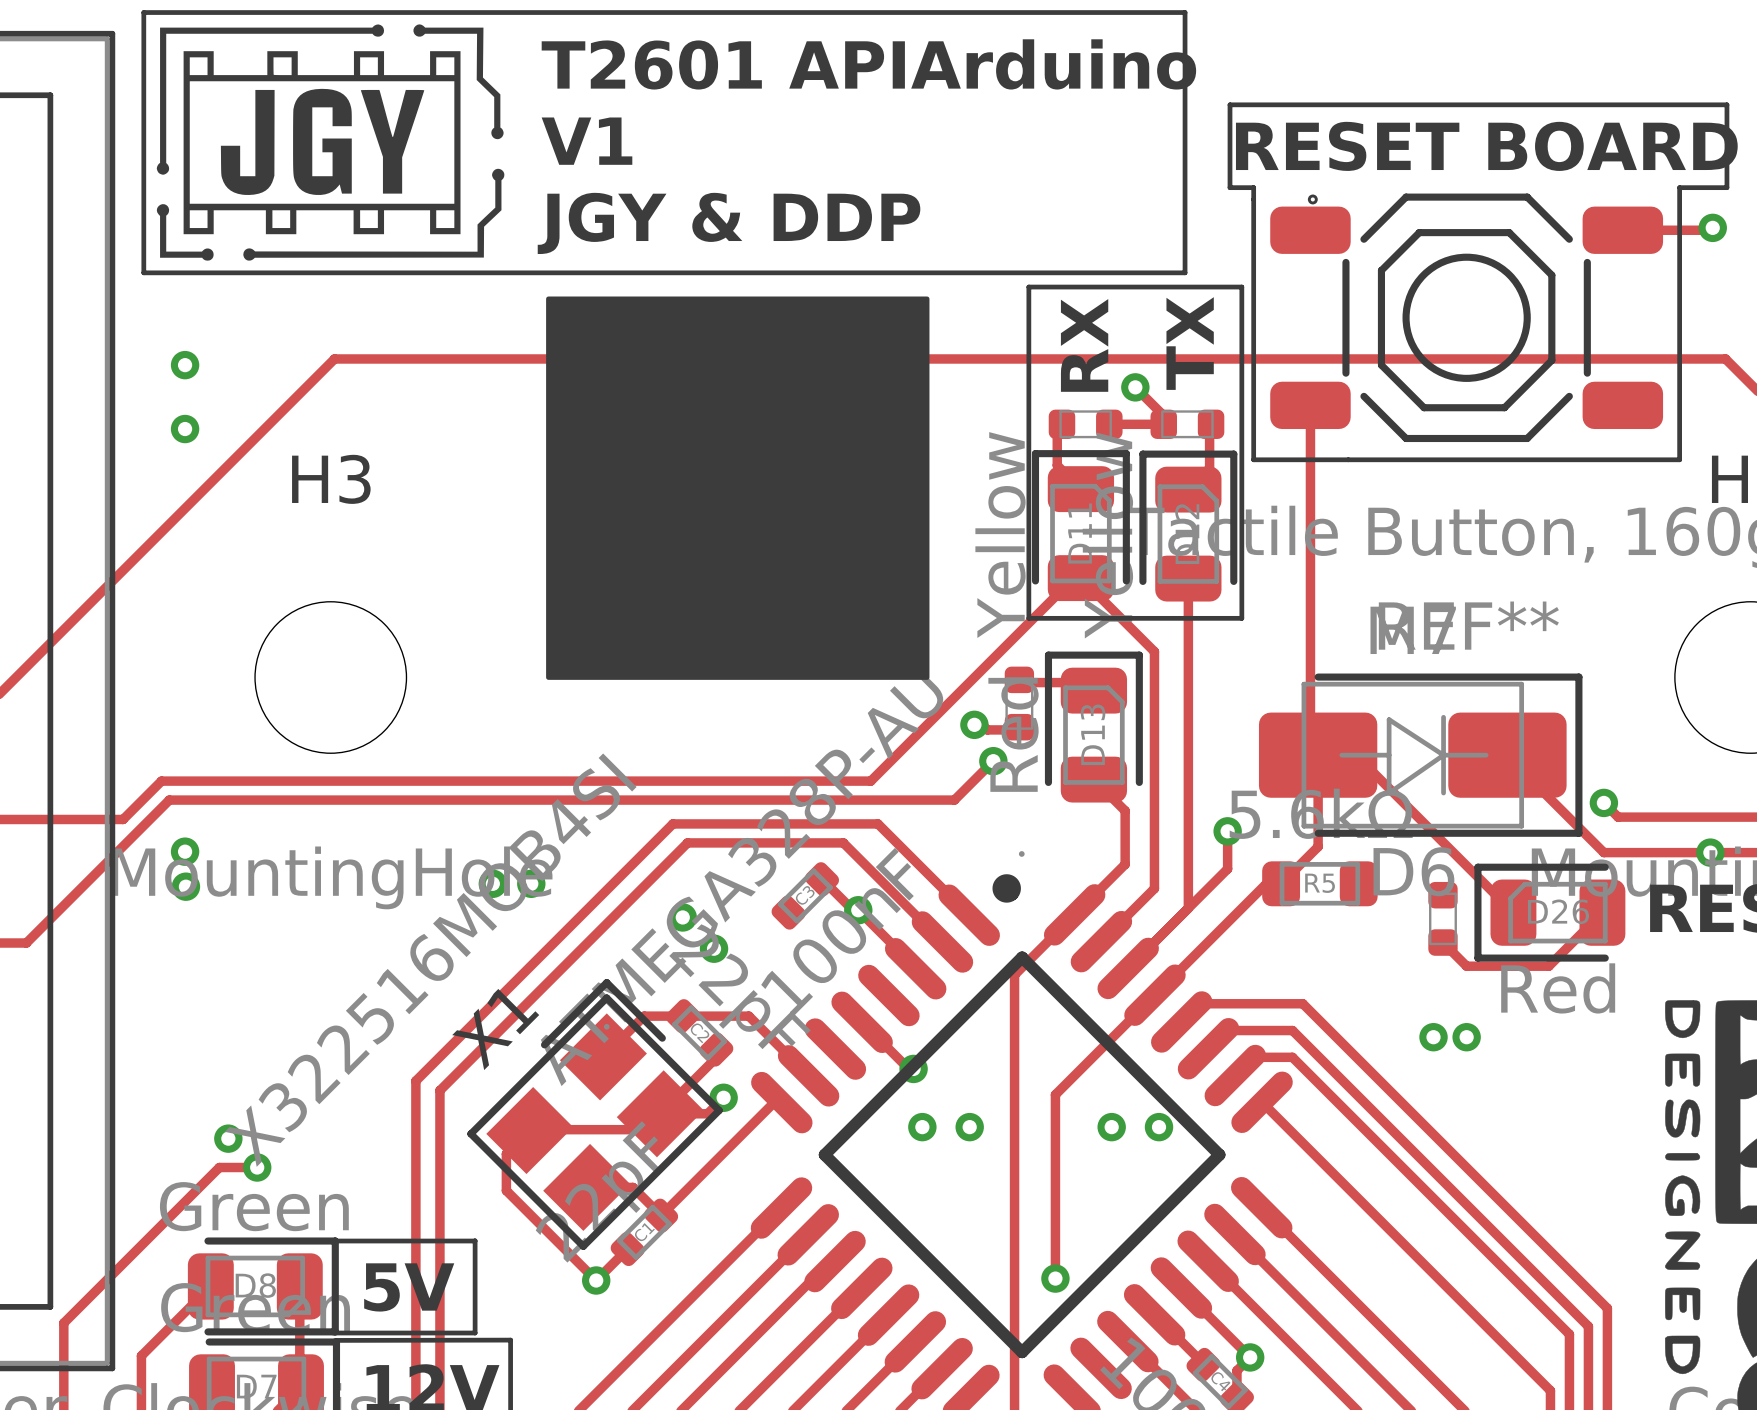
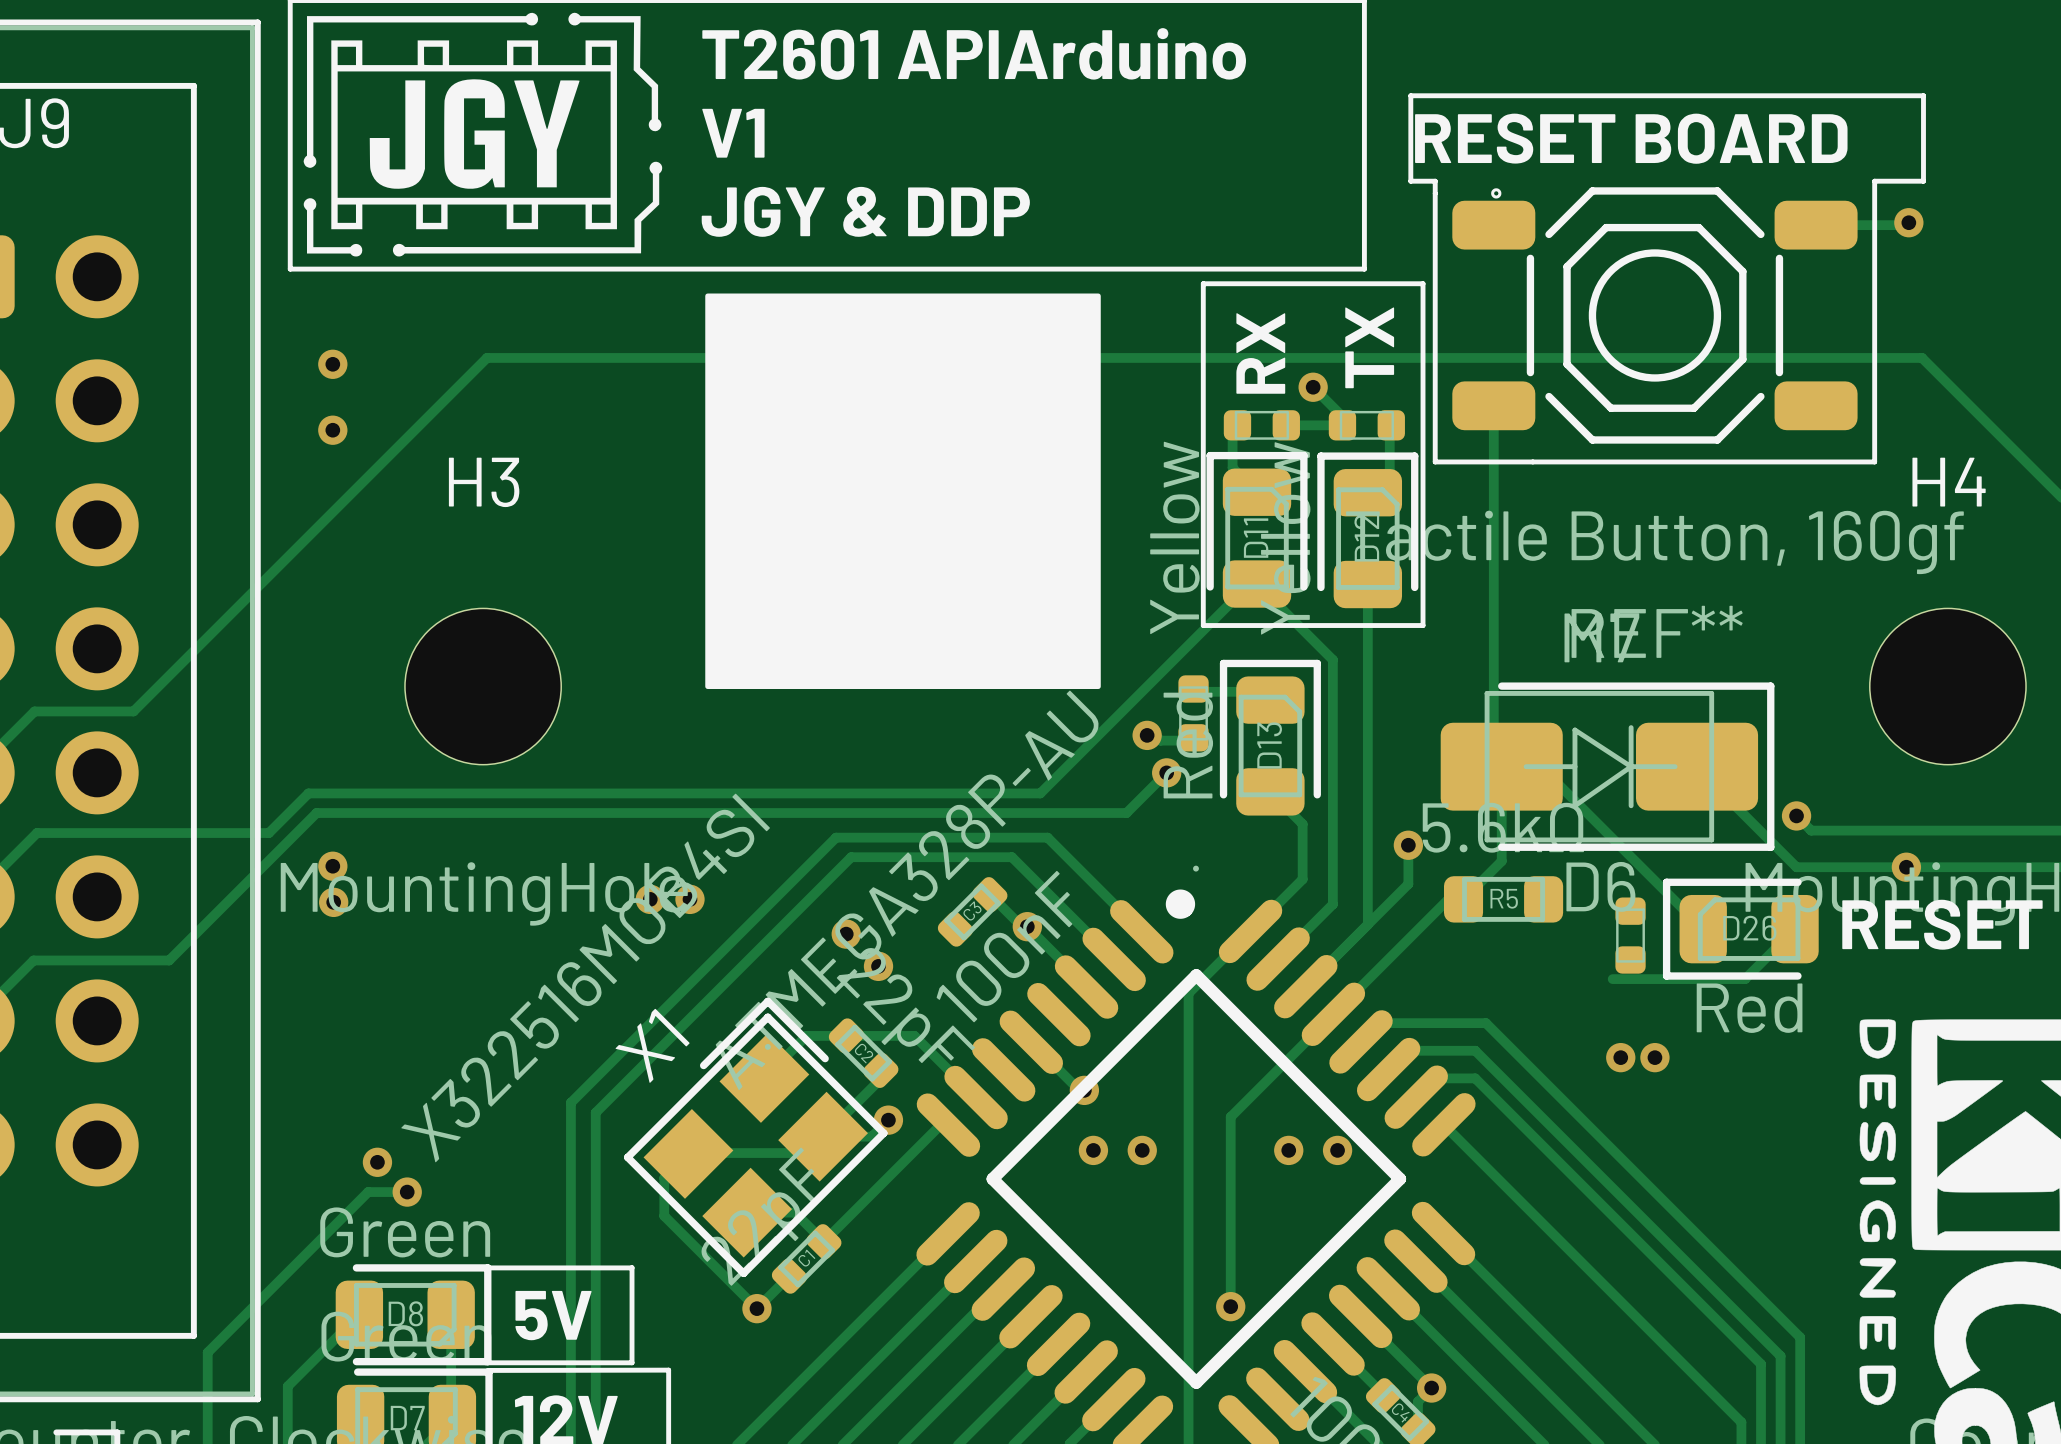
track: (1442, 942) (1466, 966) (1548, 966) (1553, 961) -> (1612, 979) (1745, 979)

